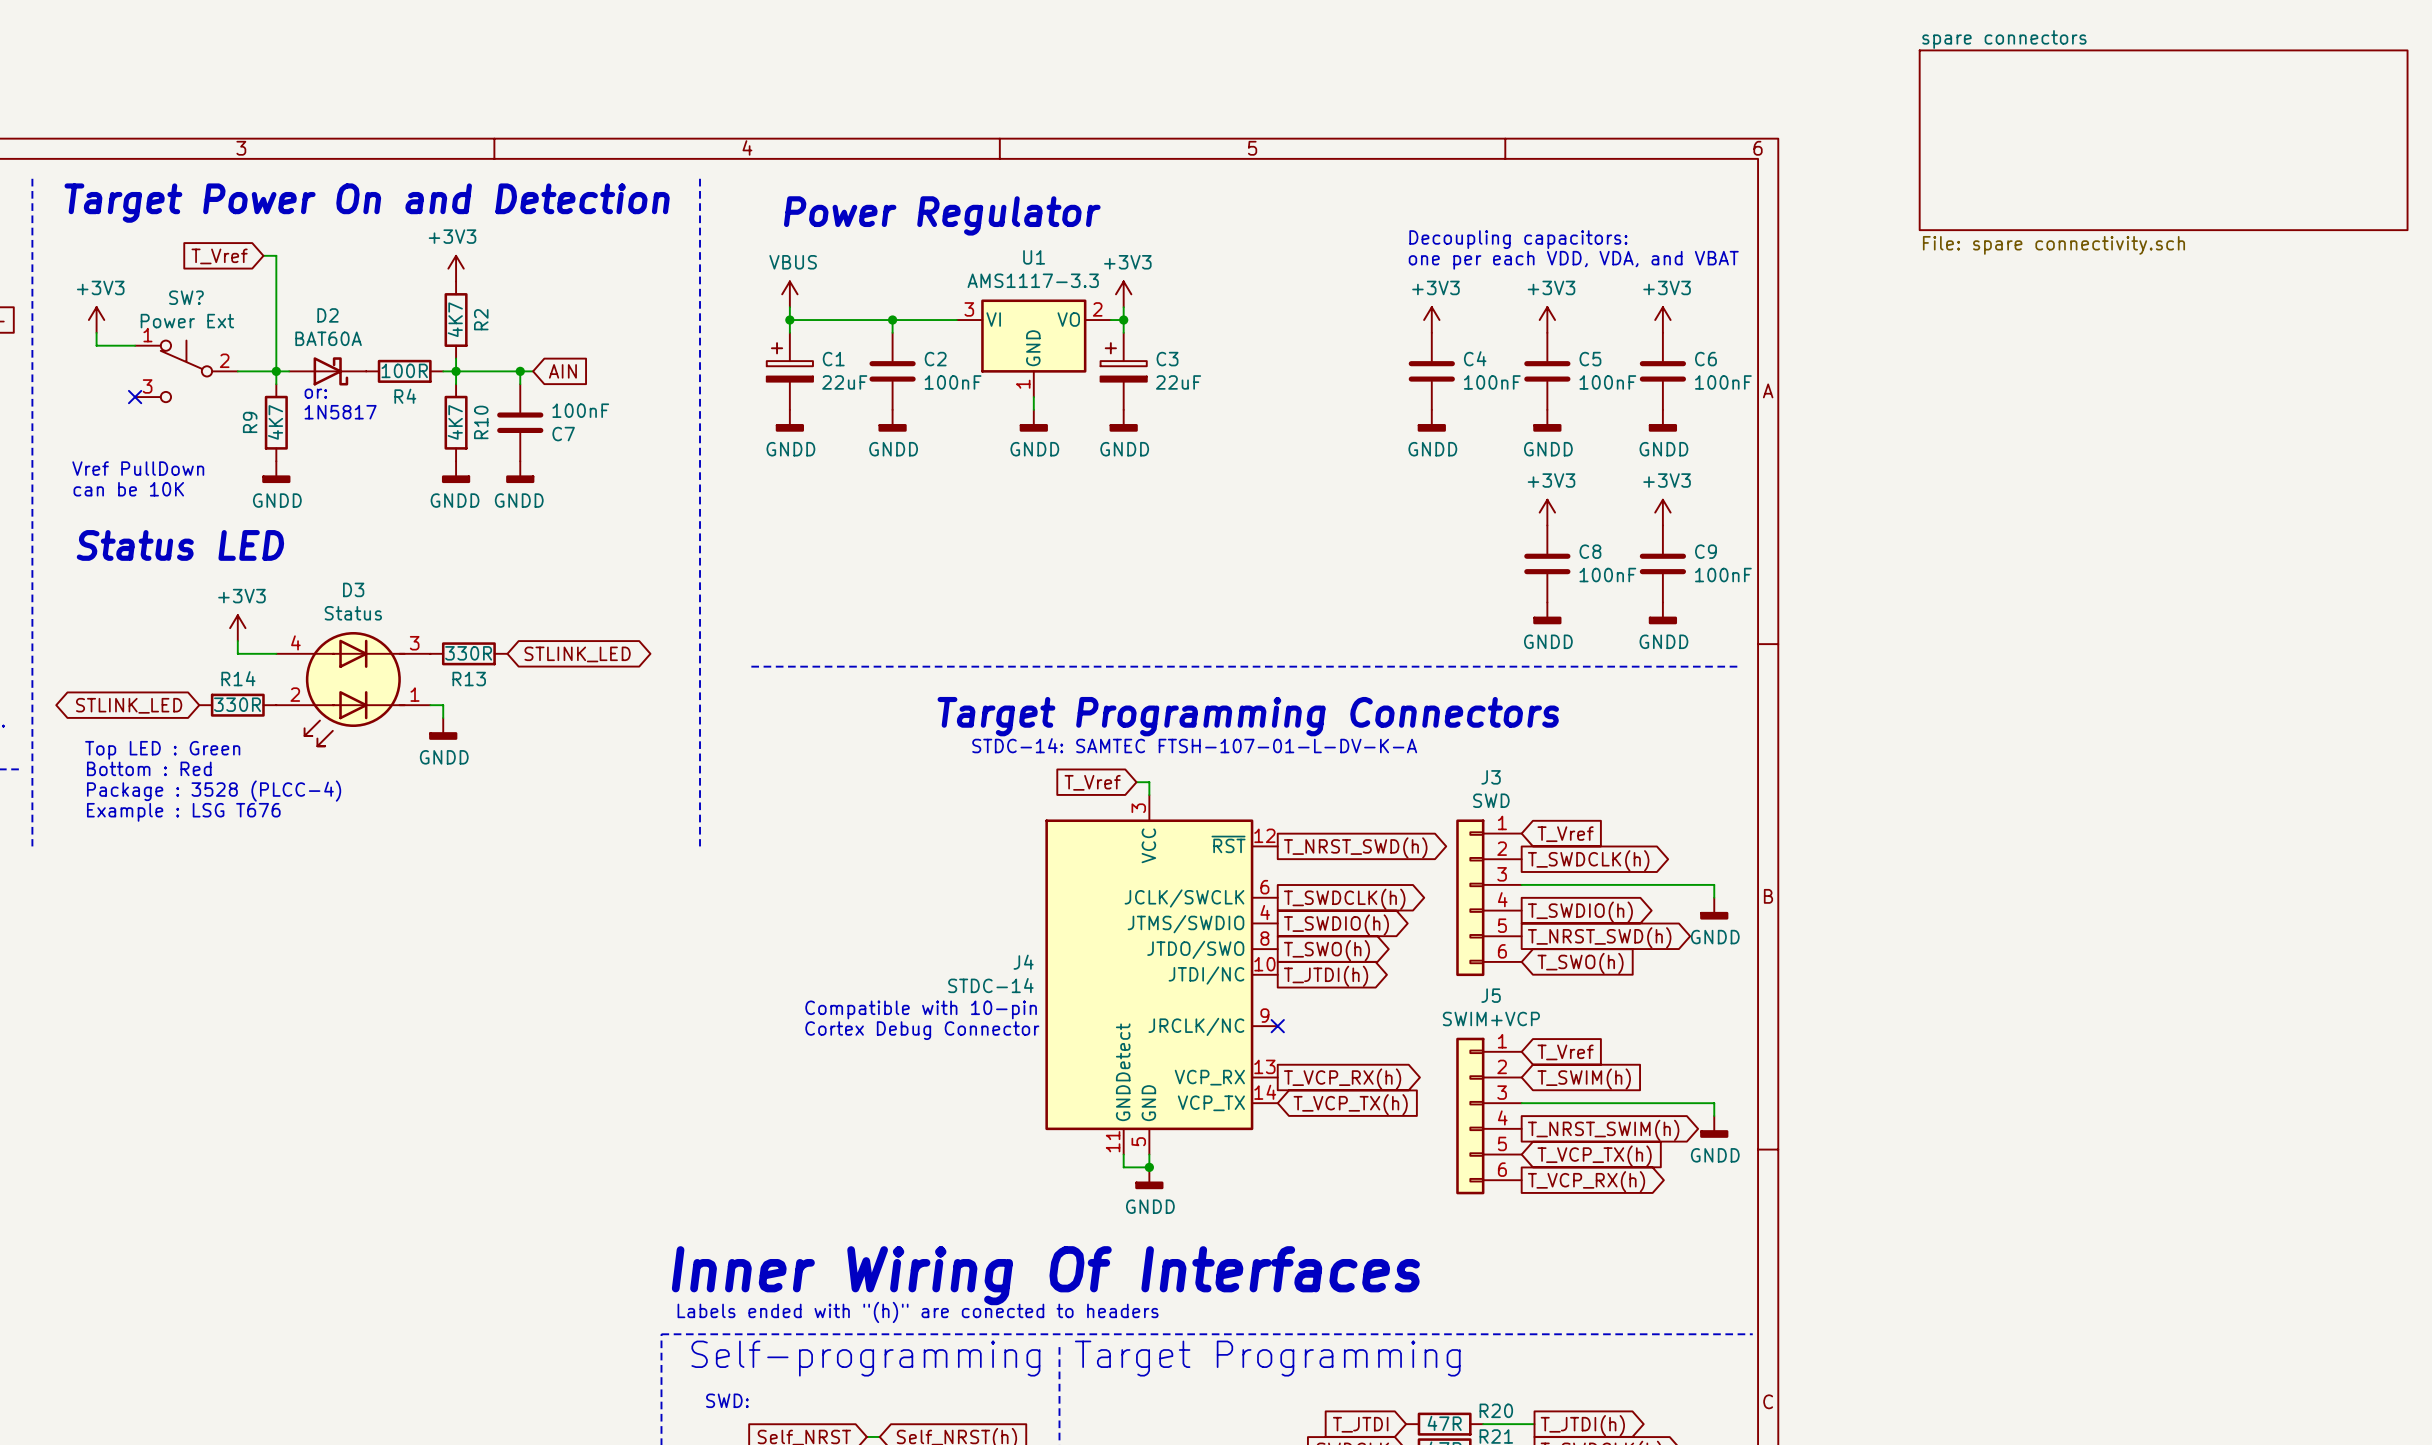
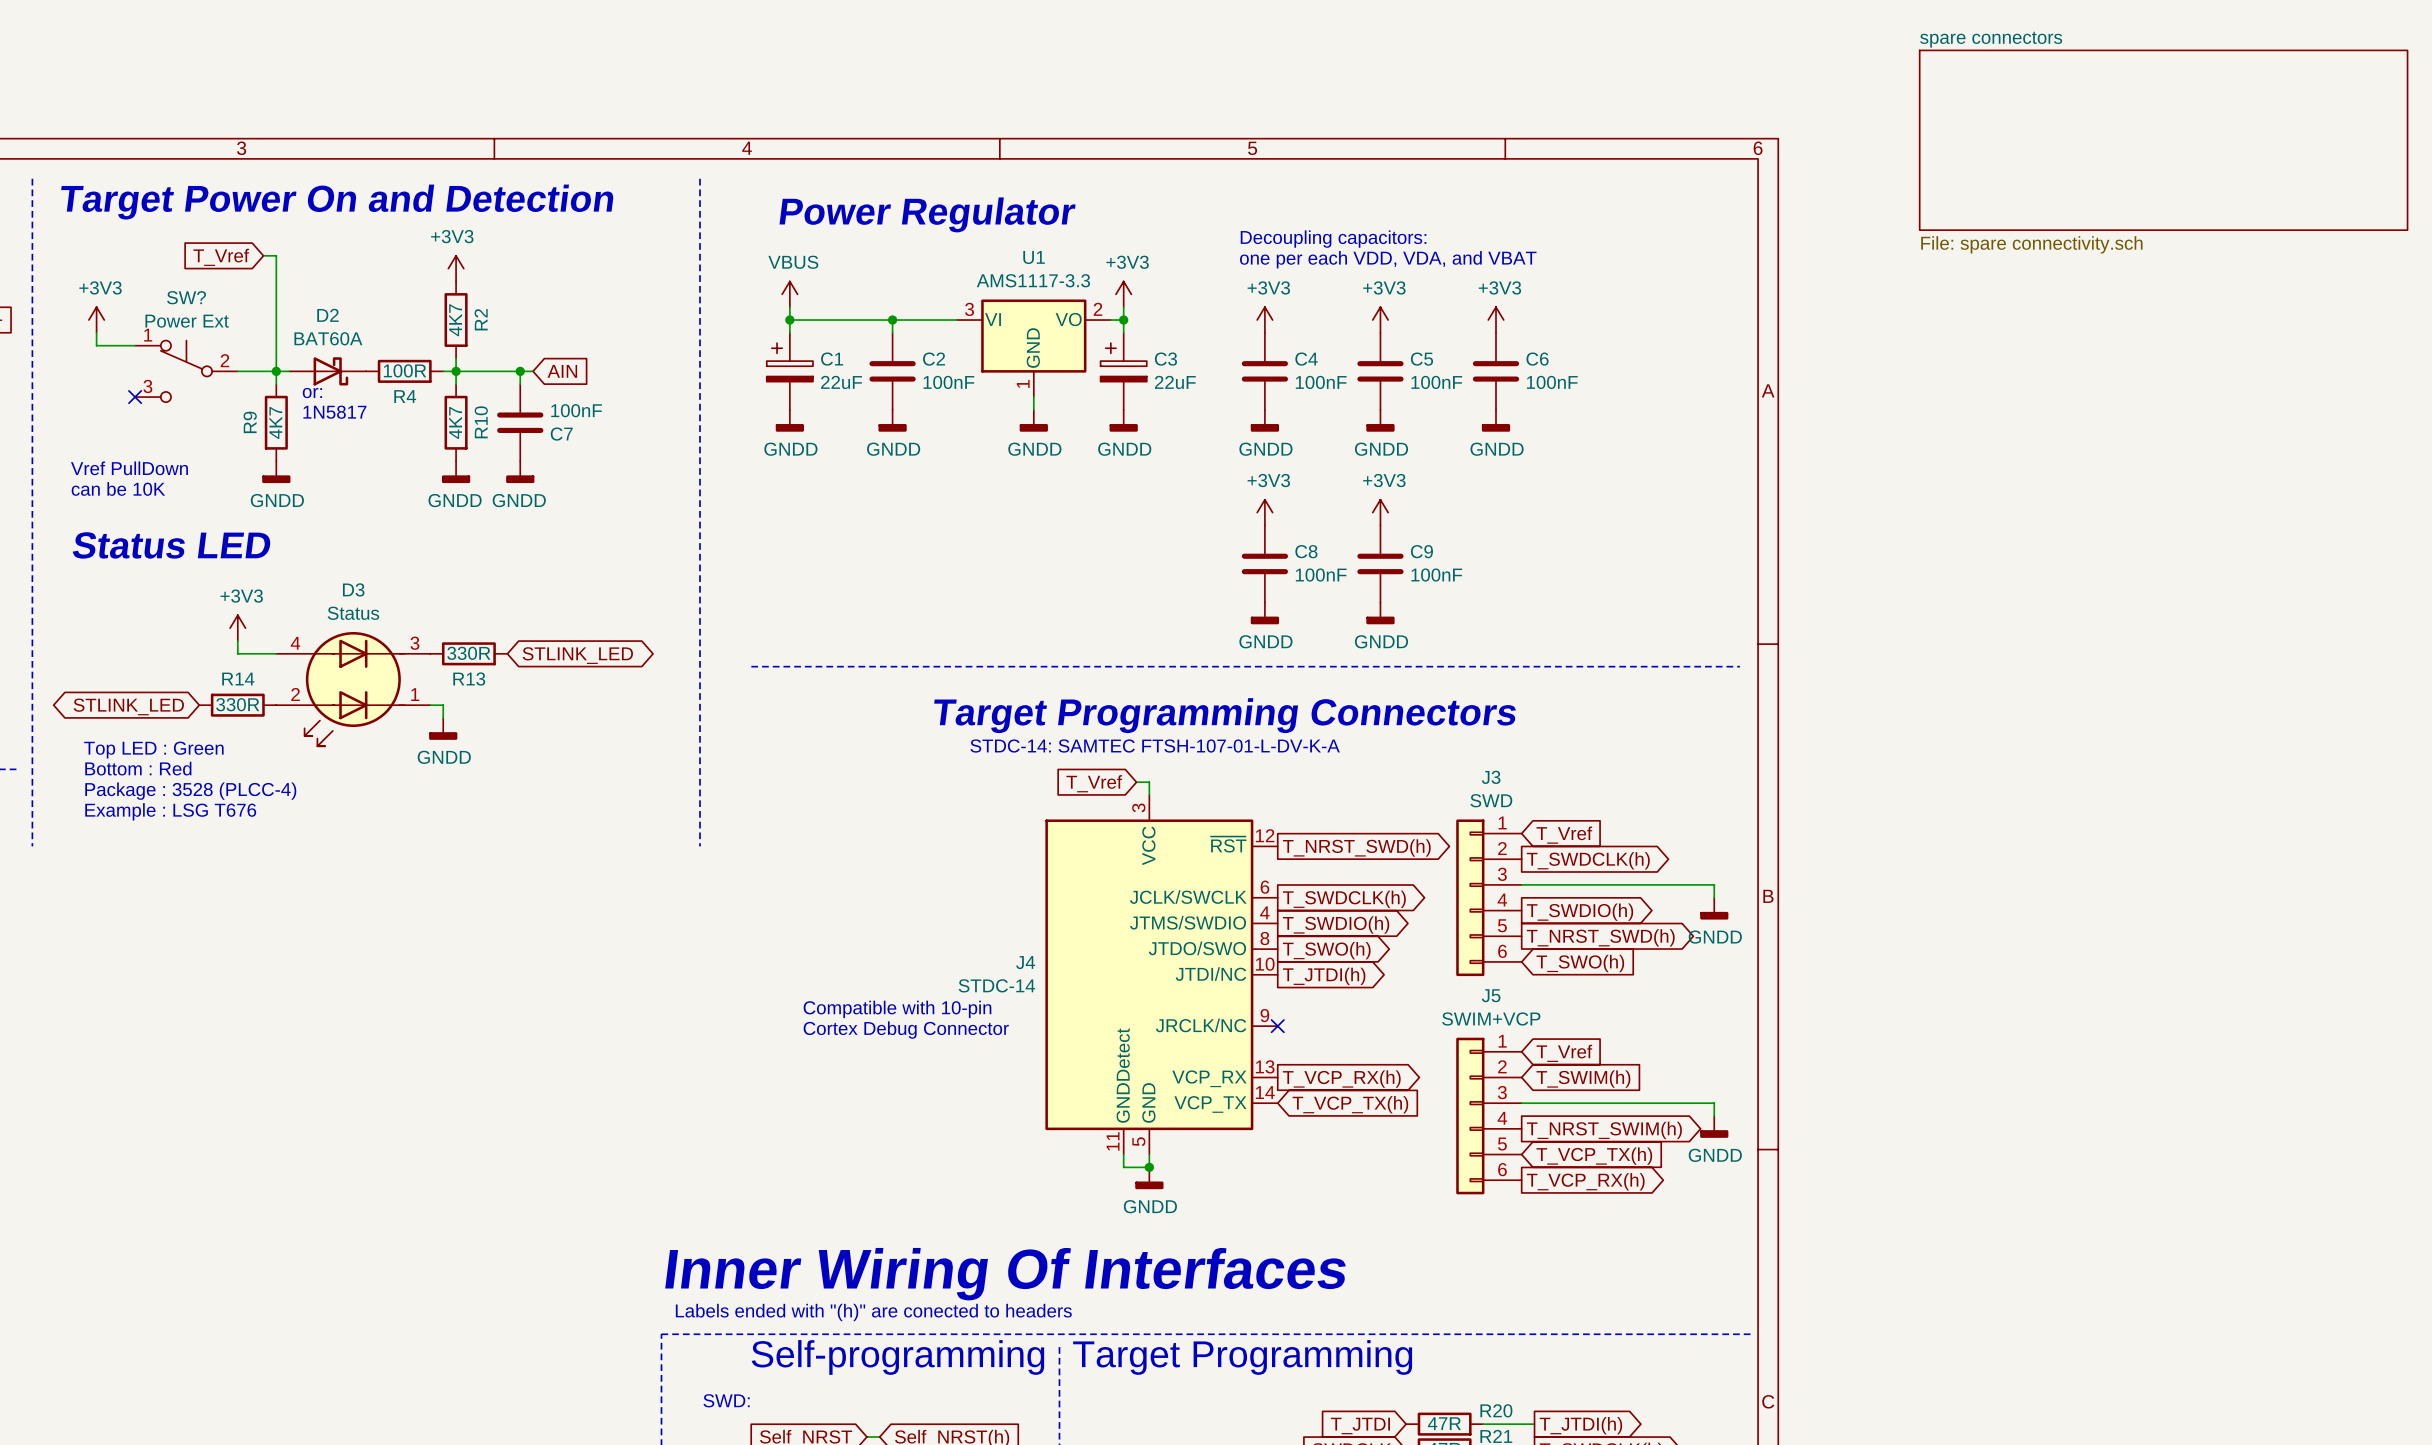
text position: Decoupling capacitors: (1518, 239) -> Decoupling capacitors: (1333, 239)
text position: one per each VDD, VDA, and VBAT (1573, 260) -> one per each VDD, VDA, and VBAT (1388, 259)
power symbol: none -> +3V3 (1264, 320)
power symbol: none -> +3V3 (1380, 320)
power symbol: +3V3 (1431, 320) -> none
power symbol: none -> +3V3 (1496, 320)
power symbol: +3V3 (1547, 320) -> none
power symbol: +3V3 (1662, 320) -> none
C4 position: (1431, 371) -> (1264, 371)
C5 position: (1547, 371) -> (1380, 371)
C6 position: (1662, 371) -> (1496, 371)
power symbol: none -> GNDD (1264, 420)
power symbol: none -> GNDD (1380, 420)
power symbol: GNDD (1431, 420) -> none
power symbol: none -> GNDD (1496, 420)
power symbol: GNDD (1547, 420) -> none
power symbol: GNDD (1662, 420) -> none
power symbol: none -> +3V3 (1264, 512)
power symbol: none -> +3V3 (1380, 512)
power symbol: +3V3 (1547, 512) -> none
power symbol: +3V3 (1662, 512) -> none
C8 position: (1547, 563) -> (1264, 563)
C9 position: (1662, 563) -> (1380, 563)
power symbol: none -> GNDD (1264, 613)
power symbol: none -> GNDD (1380, 613)
power symbol: GNDD (1547, 613) -> none
power symbol: GNDD (1662, 613) -> none

